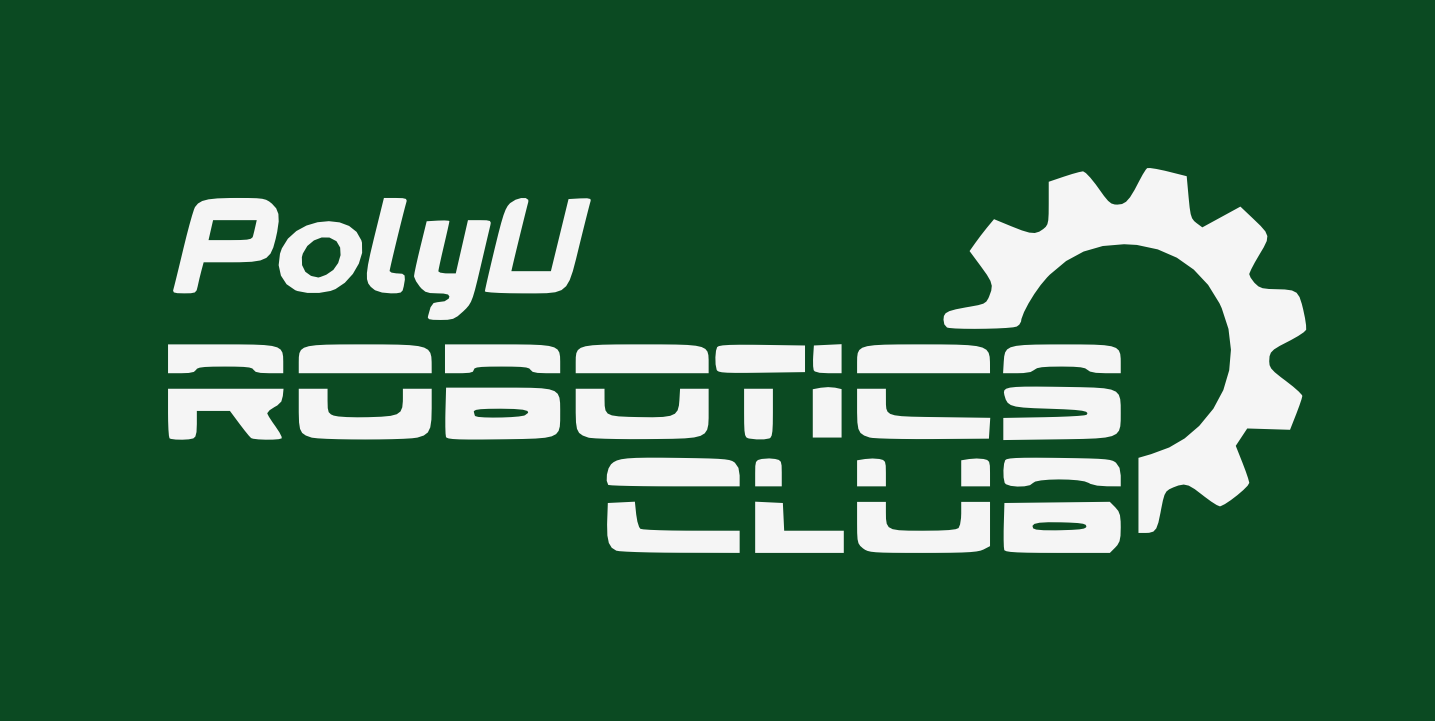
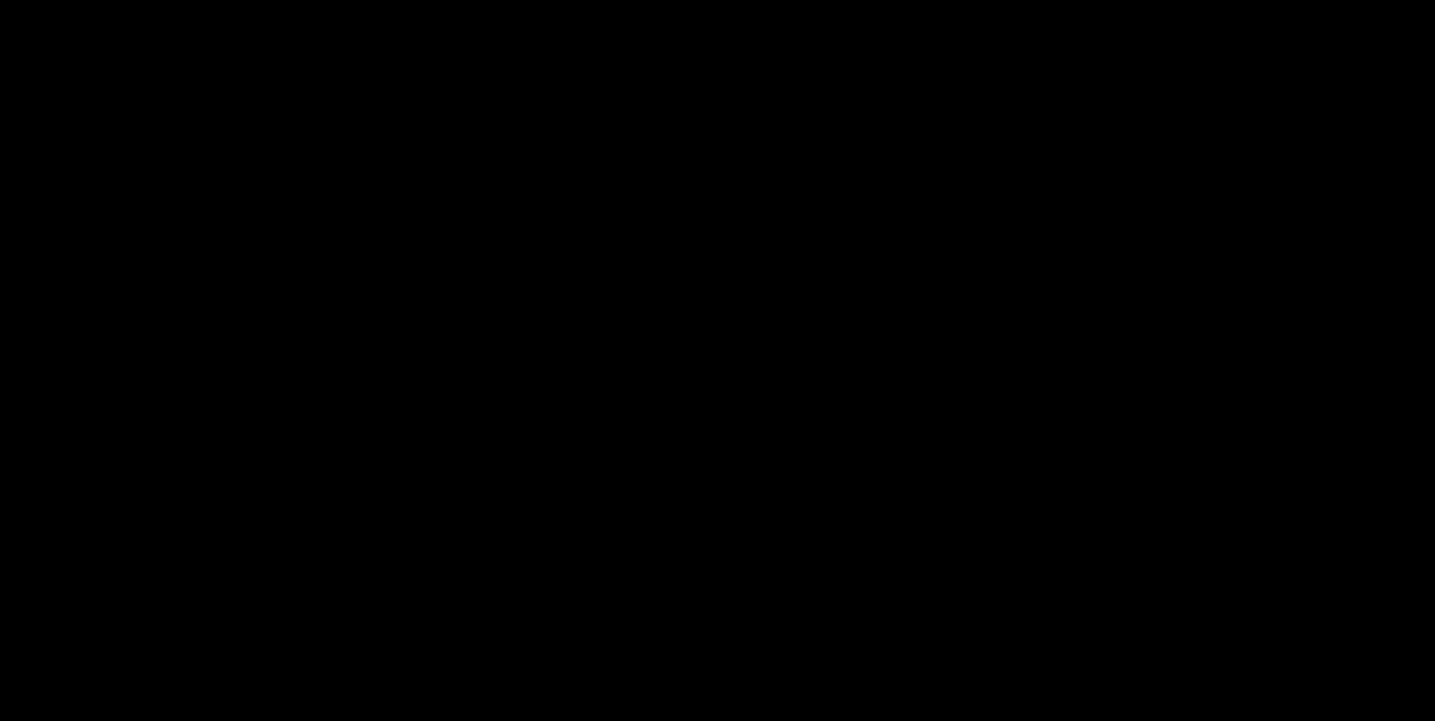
drawing: [168, 168, 1307, 553] -> none

